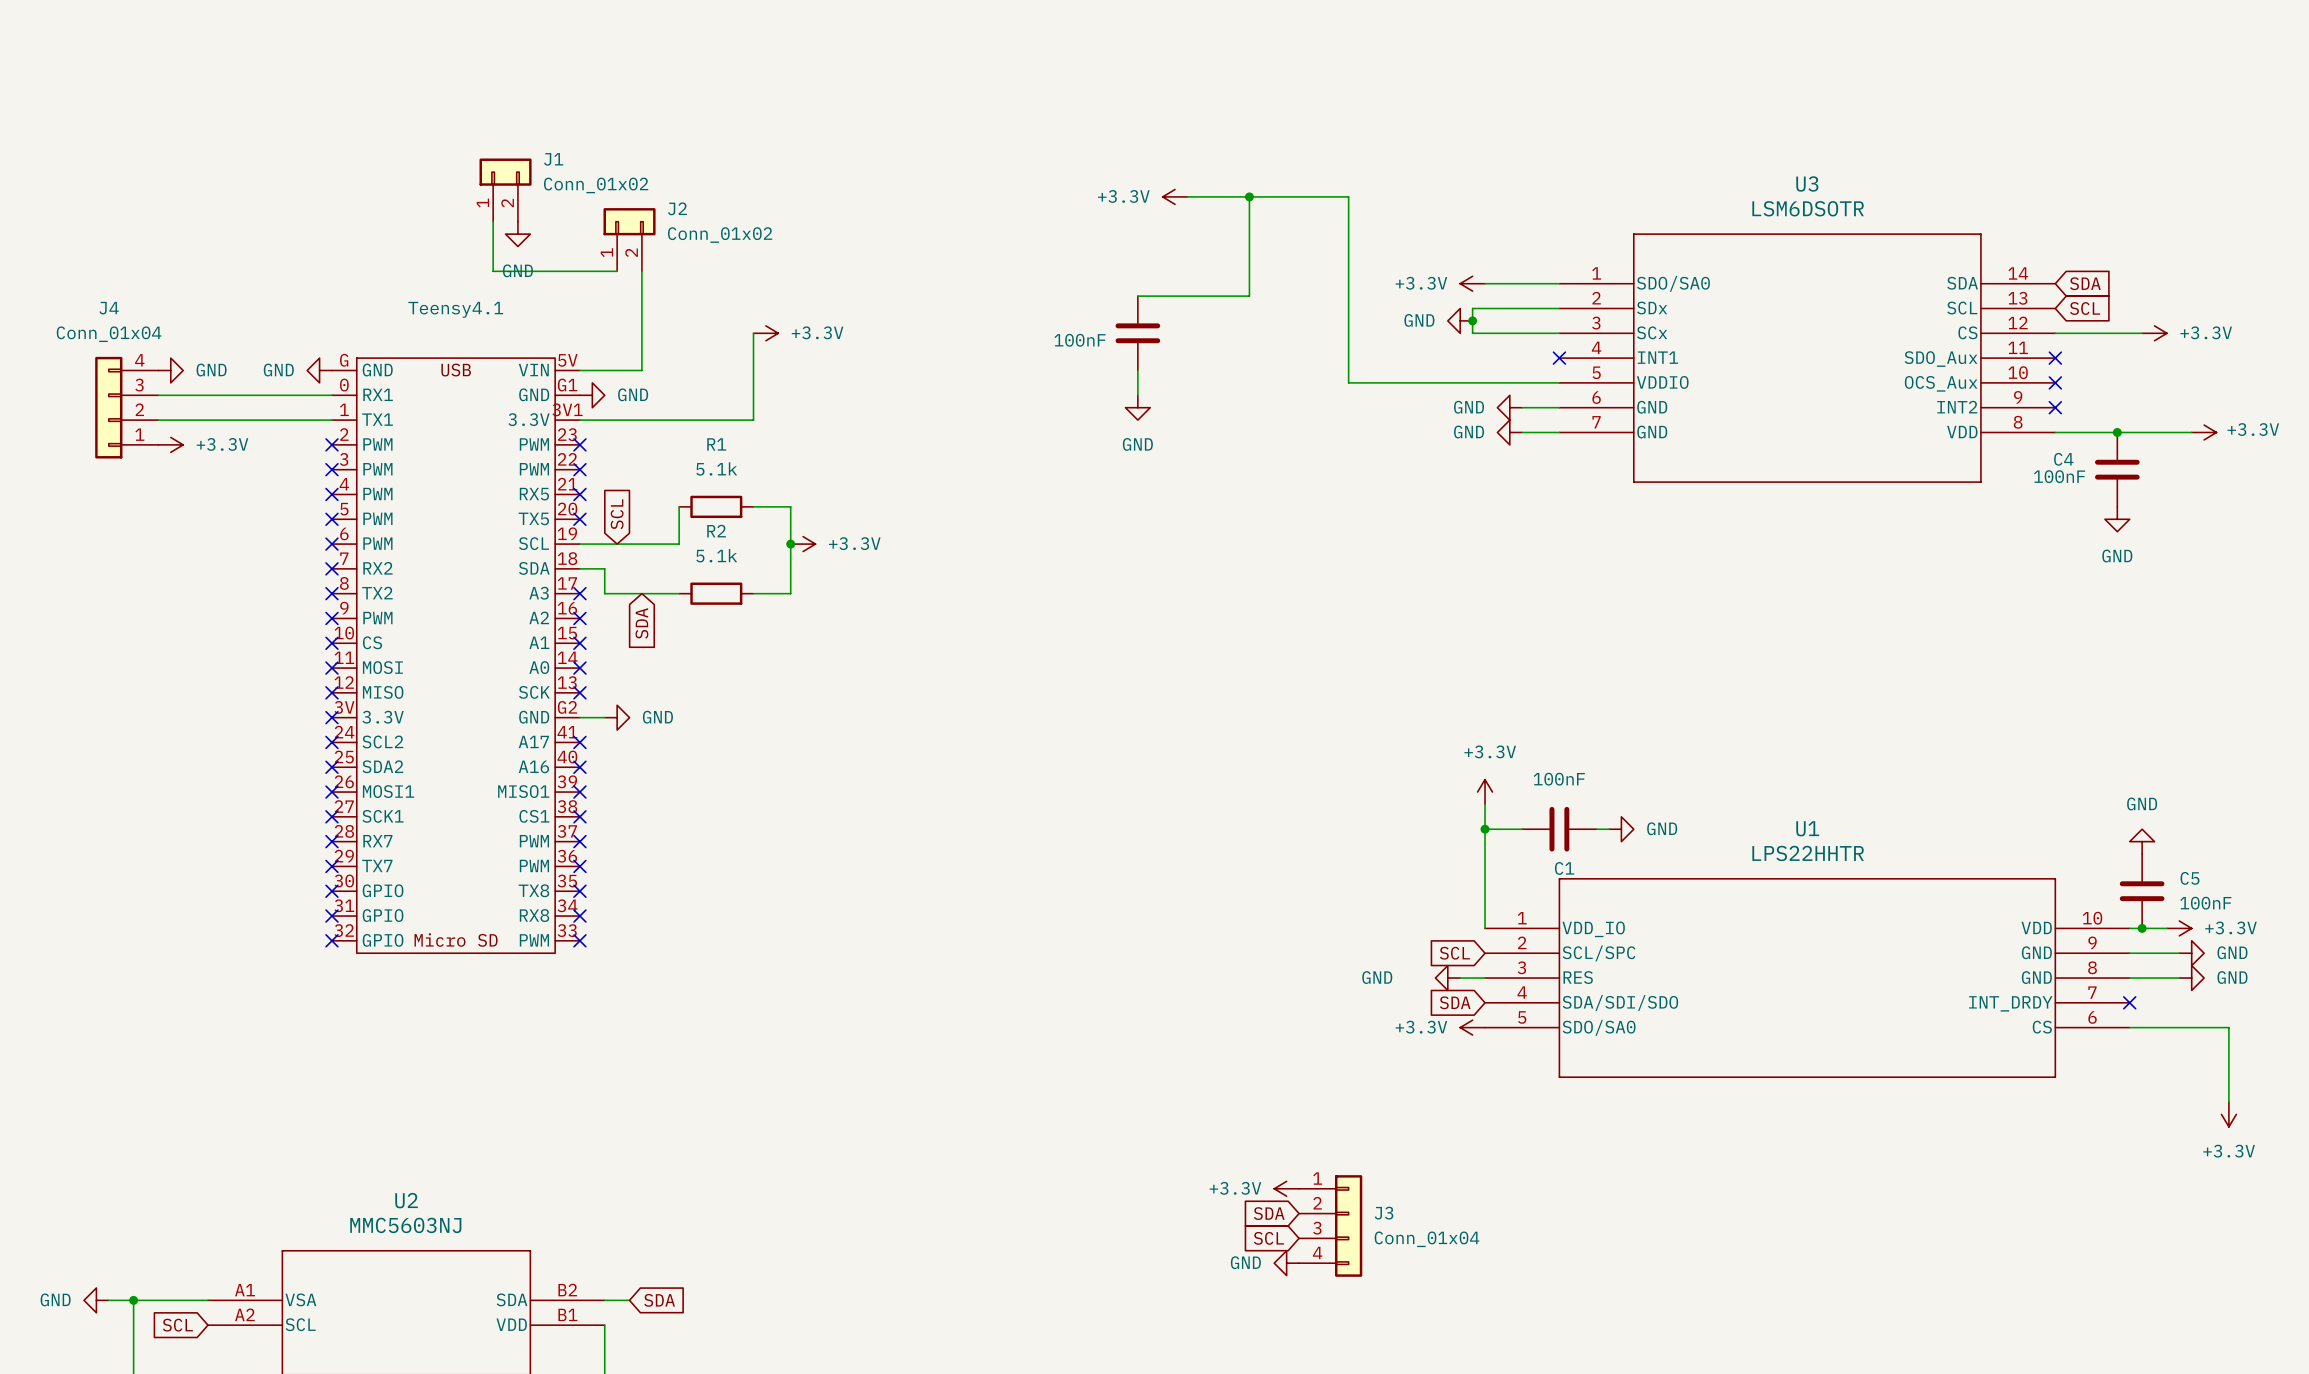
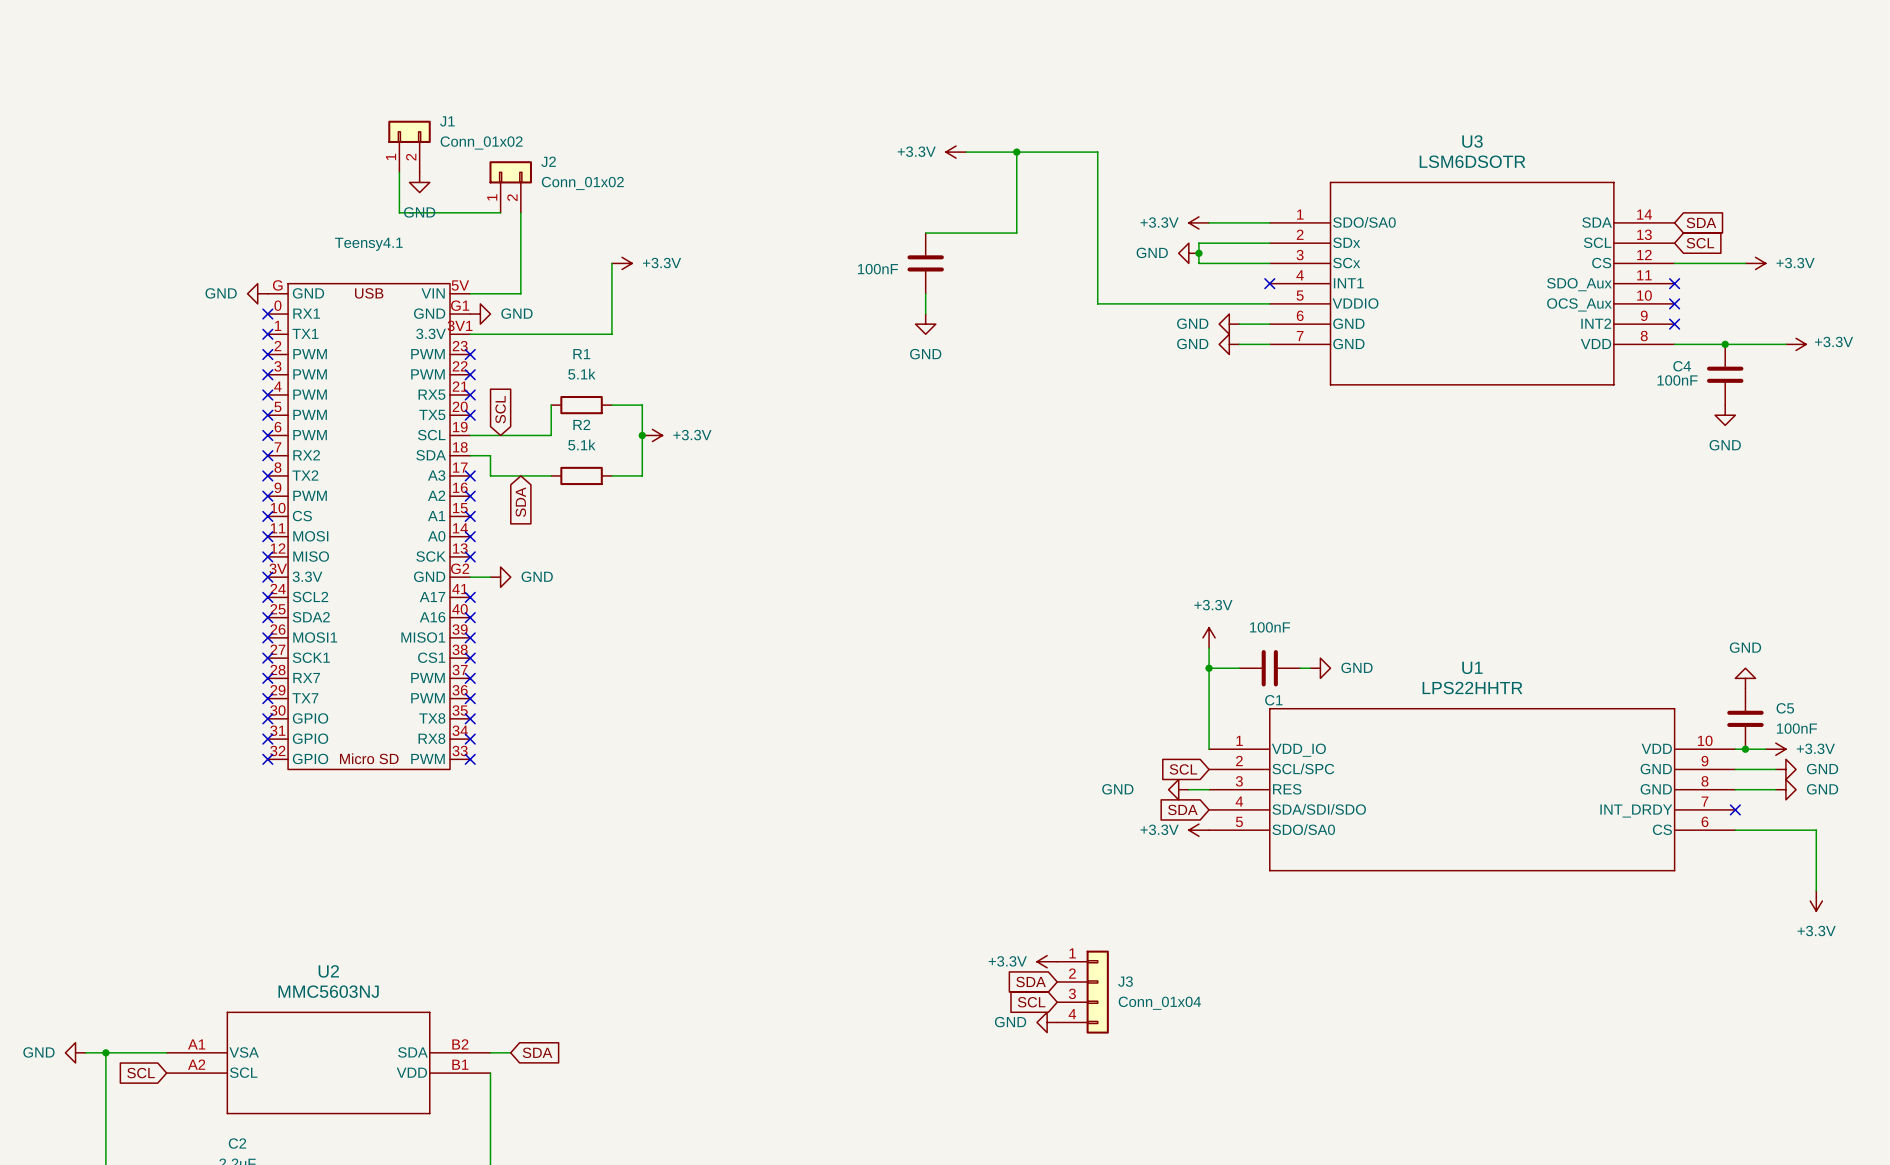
power symbol: GND (170, 370) -> none
wire: (158, 395) (331, 395) -> none
no-connect mark: none -> (267, 314)
J4: Conn_01x04 (126, 407) -> none
wire: (158, 420) (331, 420) -> none
no-connect mark: none -> (267, 334)
power symbol: +3.3V (170, 444) -> none

